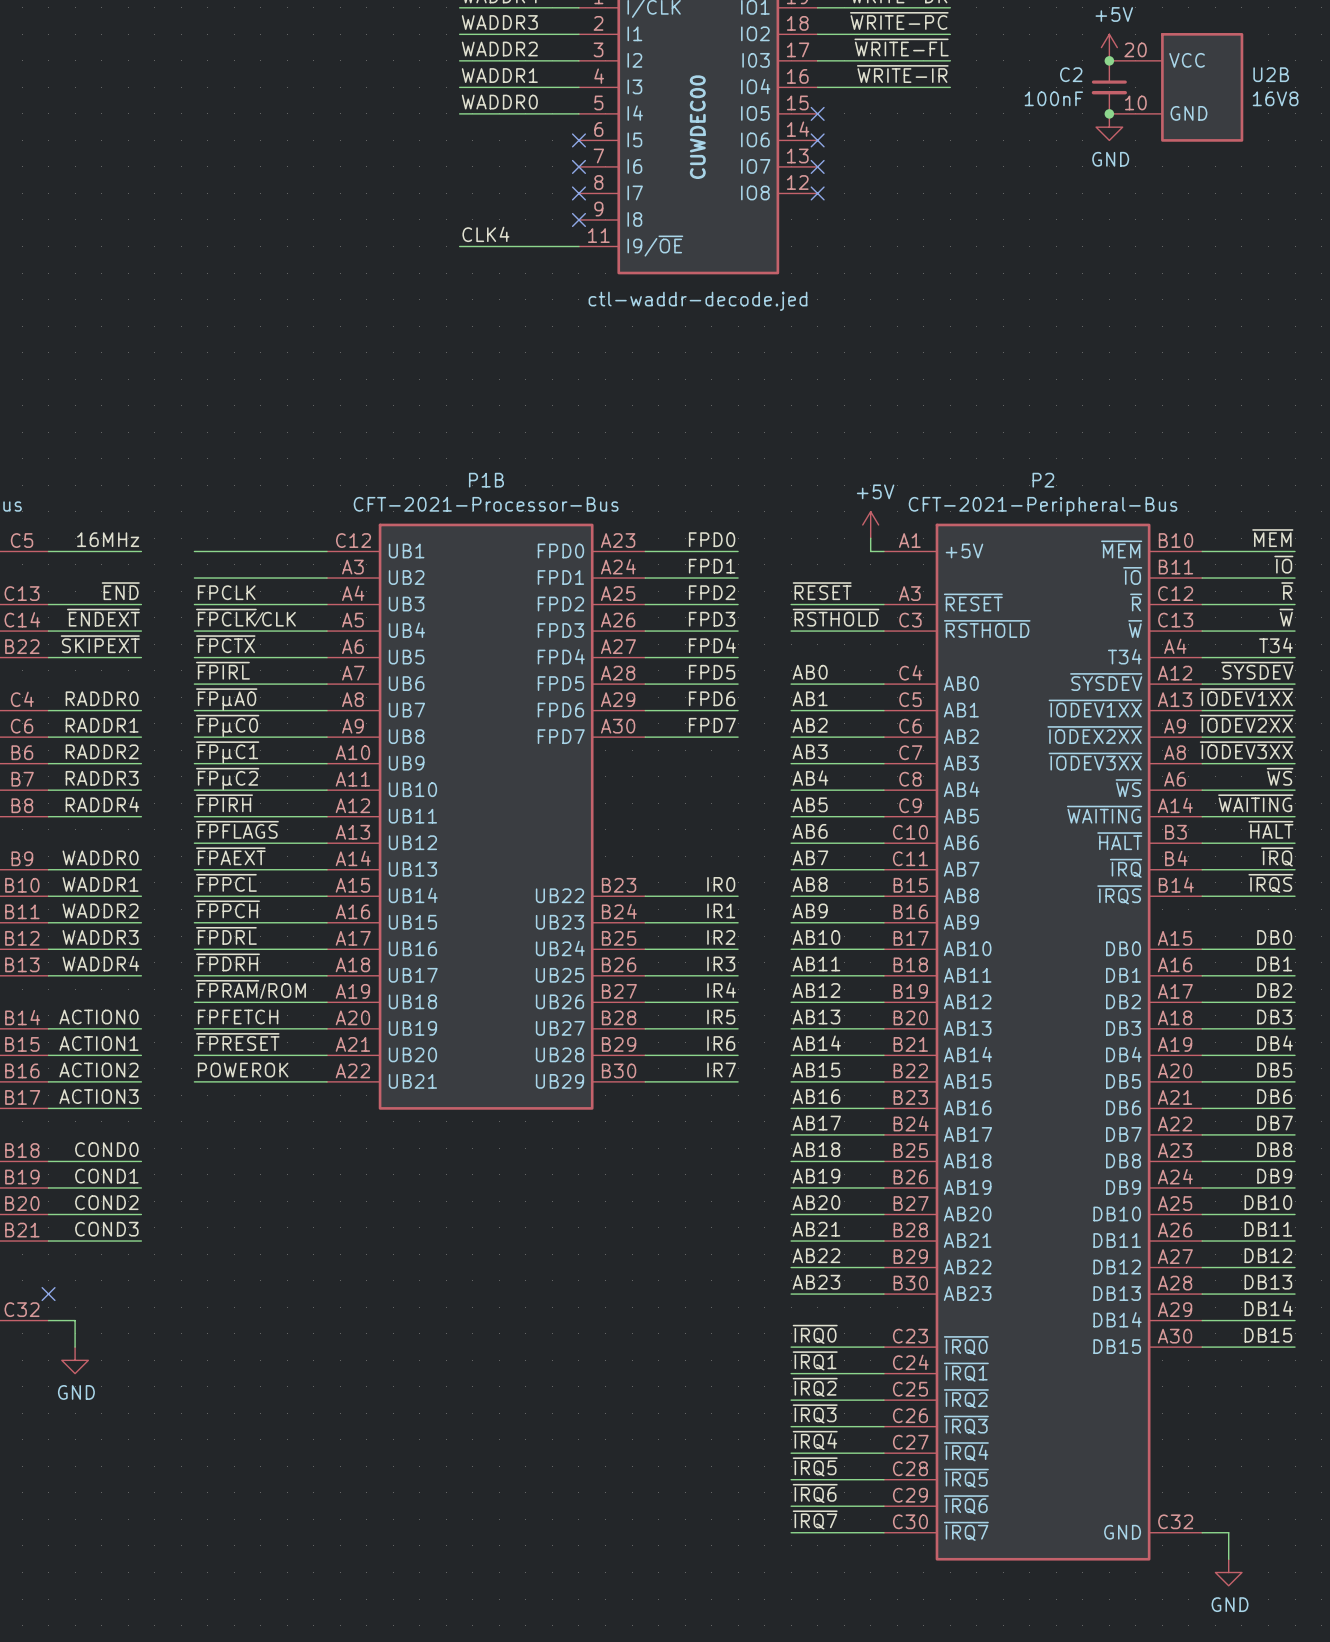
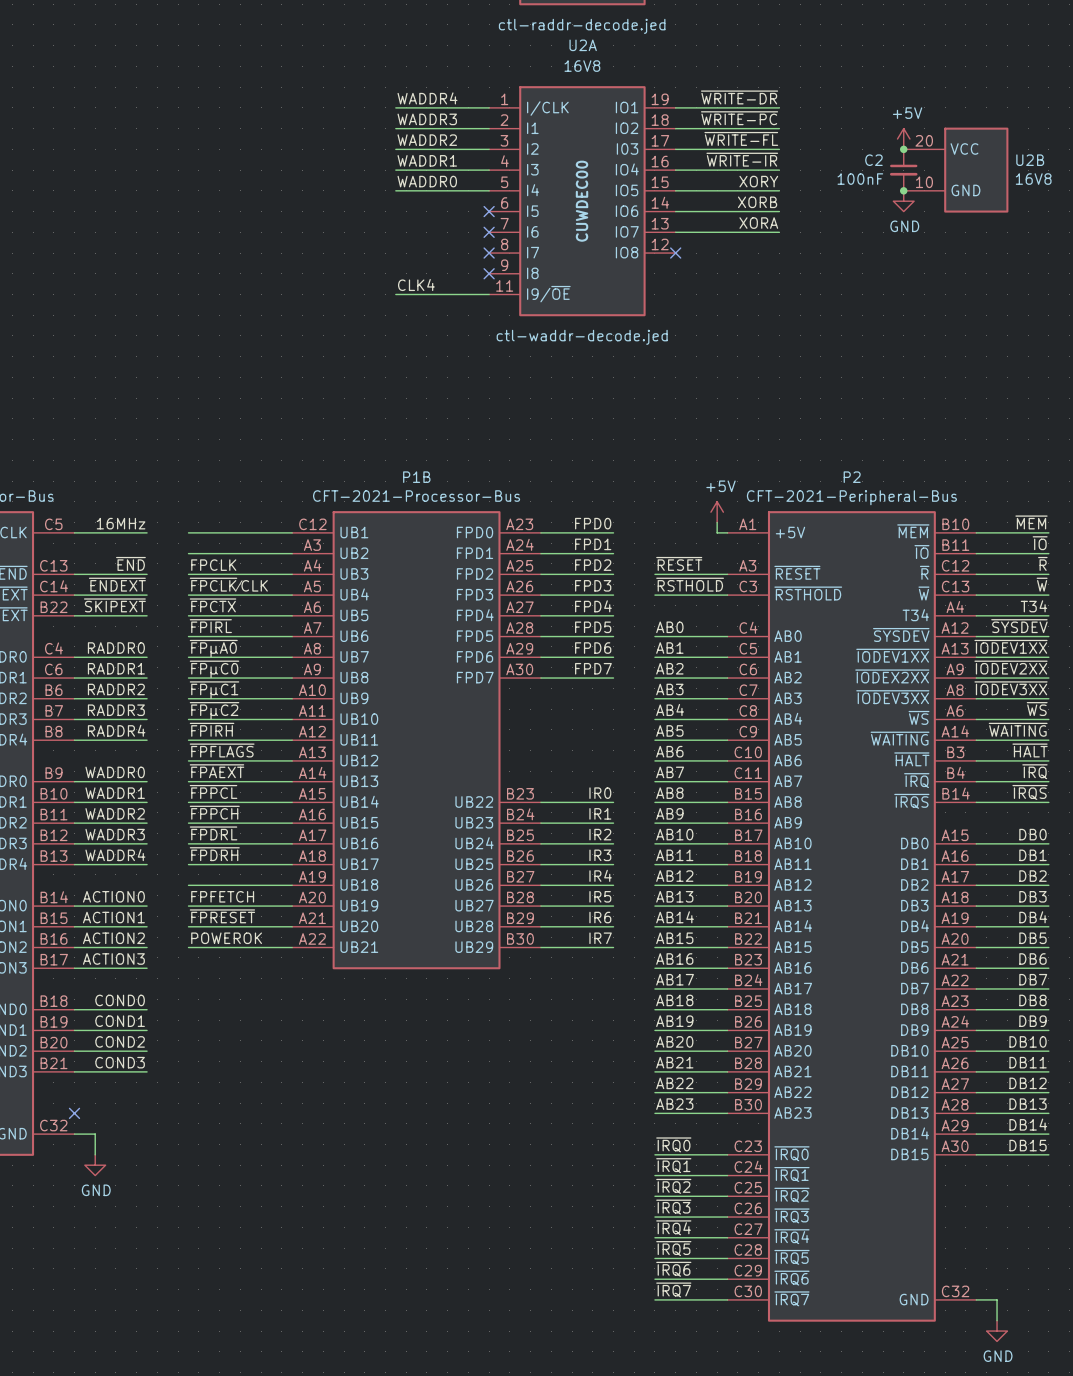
label: none -> XORY (758, 181)
wire: none -> (675, 190) (779, 190)
no-connect mark: (817, 113) -> none
label: none -> XORB (757, 202)
wire: none -> (675, 211) (779, 211)
no-connect mark: (817, 140) -> none
label: none -> XORA (758, 223)
wire: none -> (675, 232) (779, 232)
no-connect mark: (817, 166) -> none
label: ~{FPRAM}∕ROM (250, 989) -> none

